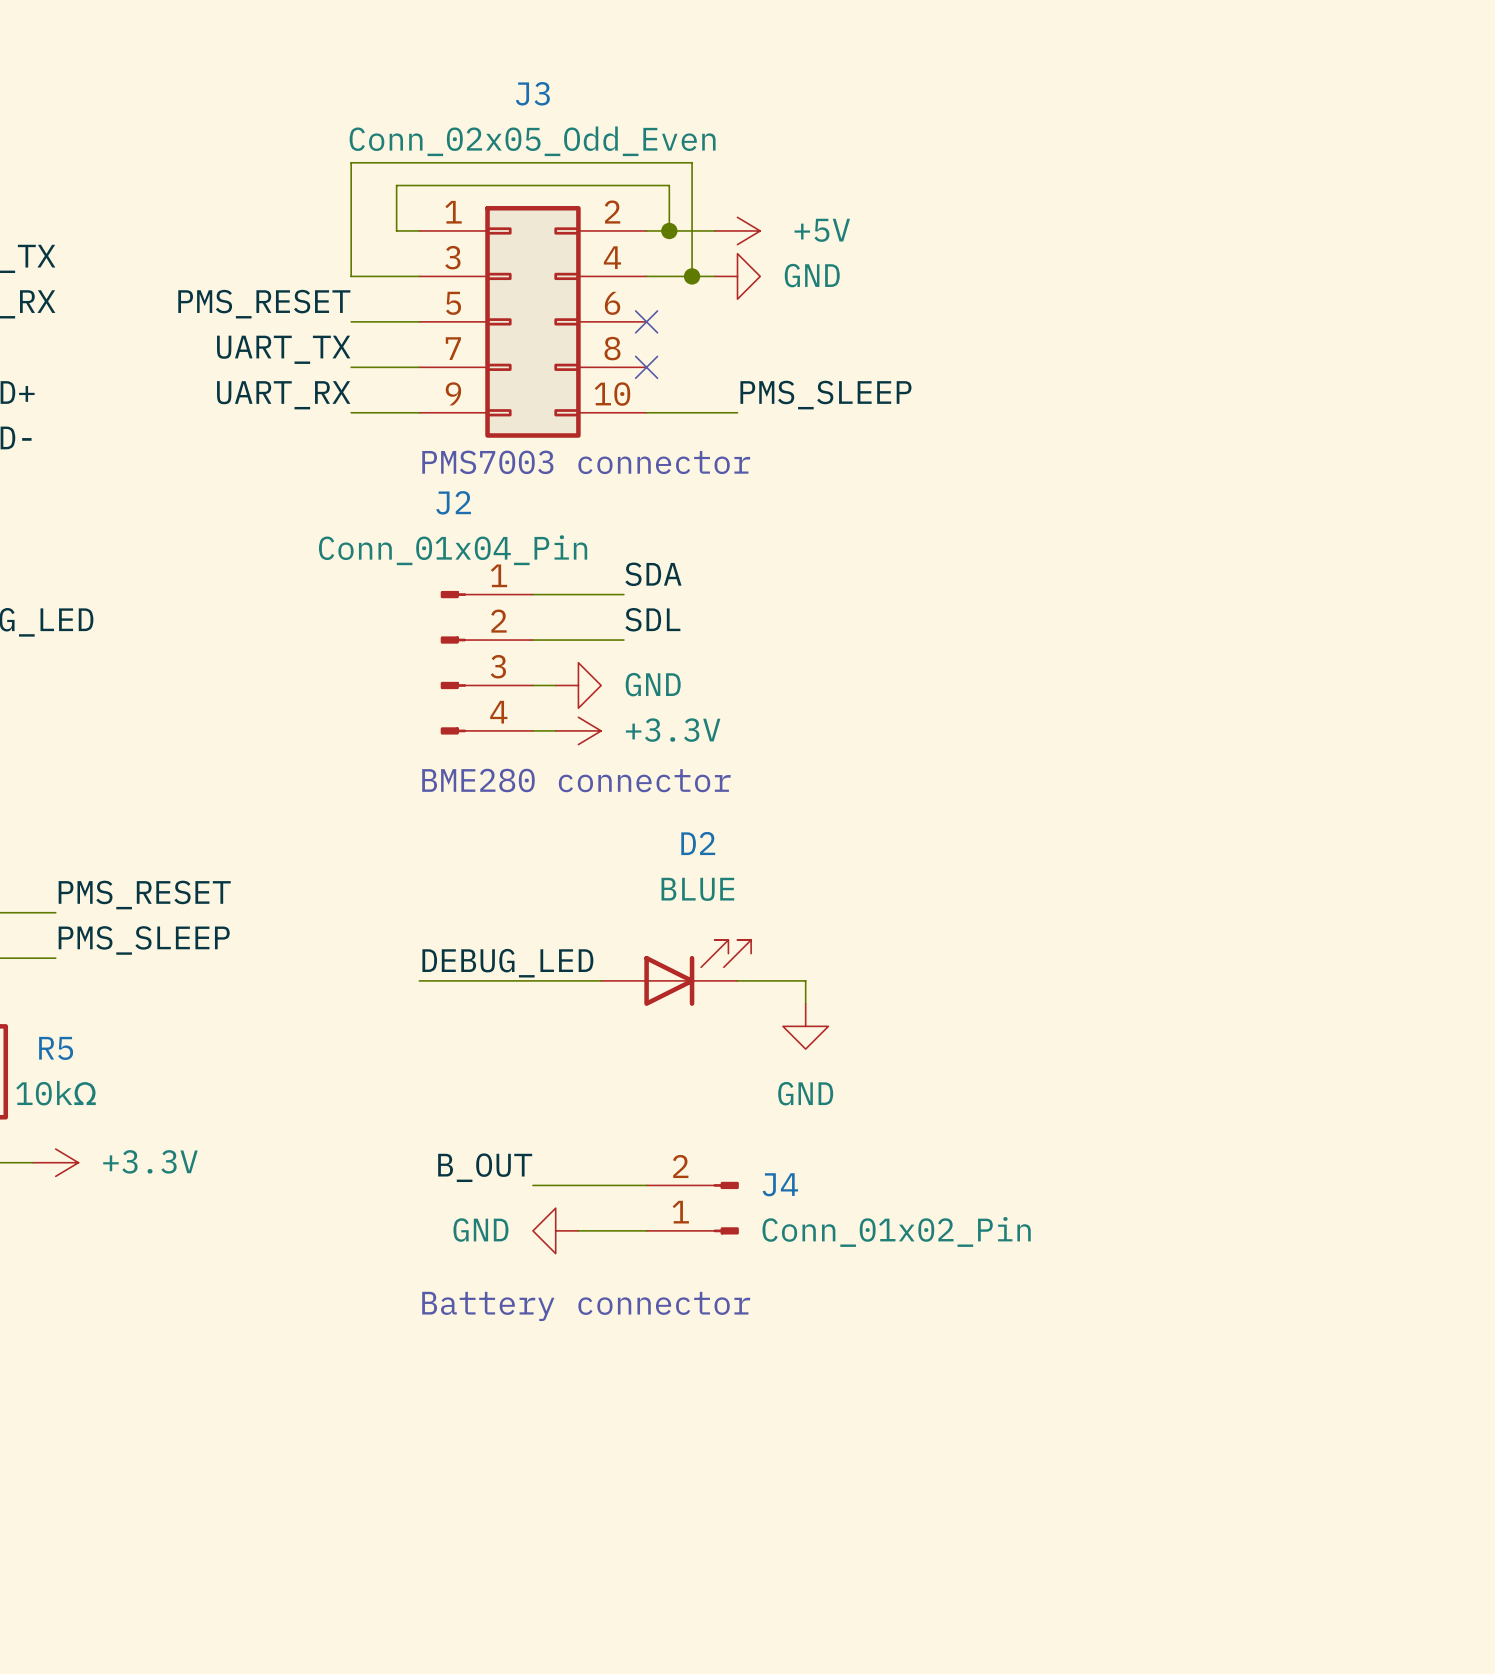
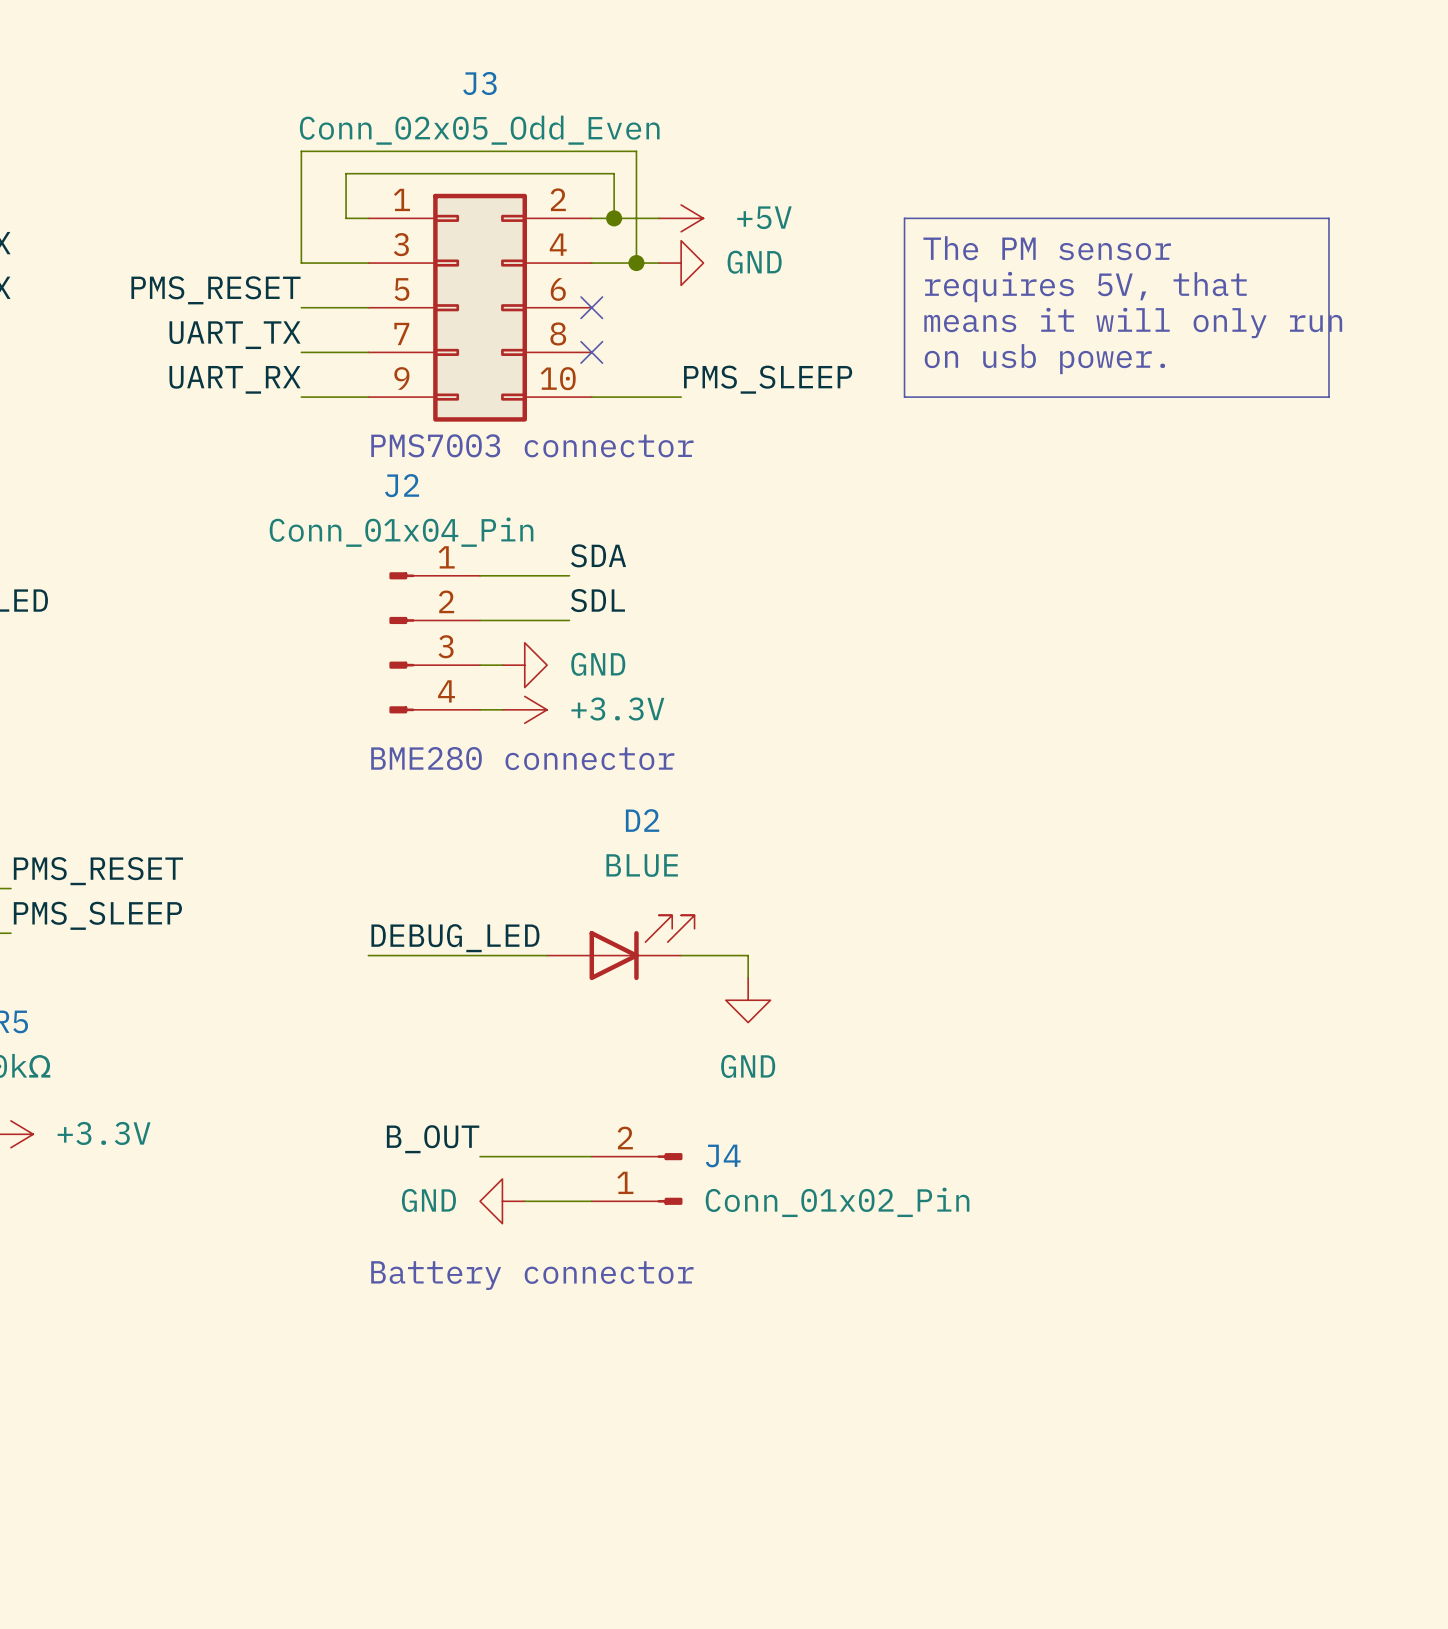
line: none -> (904, 218) (1328, 218) (1328, 397) (904, 397) (904, 218)
text: none -> The PM sensor (1047, 248)
text: none -> requires 5V, that (1085, 287)
text: none -> means it will only run (1133, 323)
text: none -> on usb power. (1044, 359)

